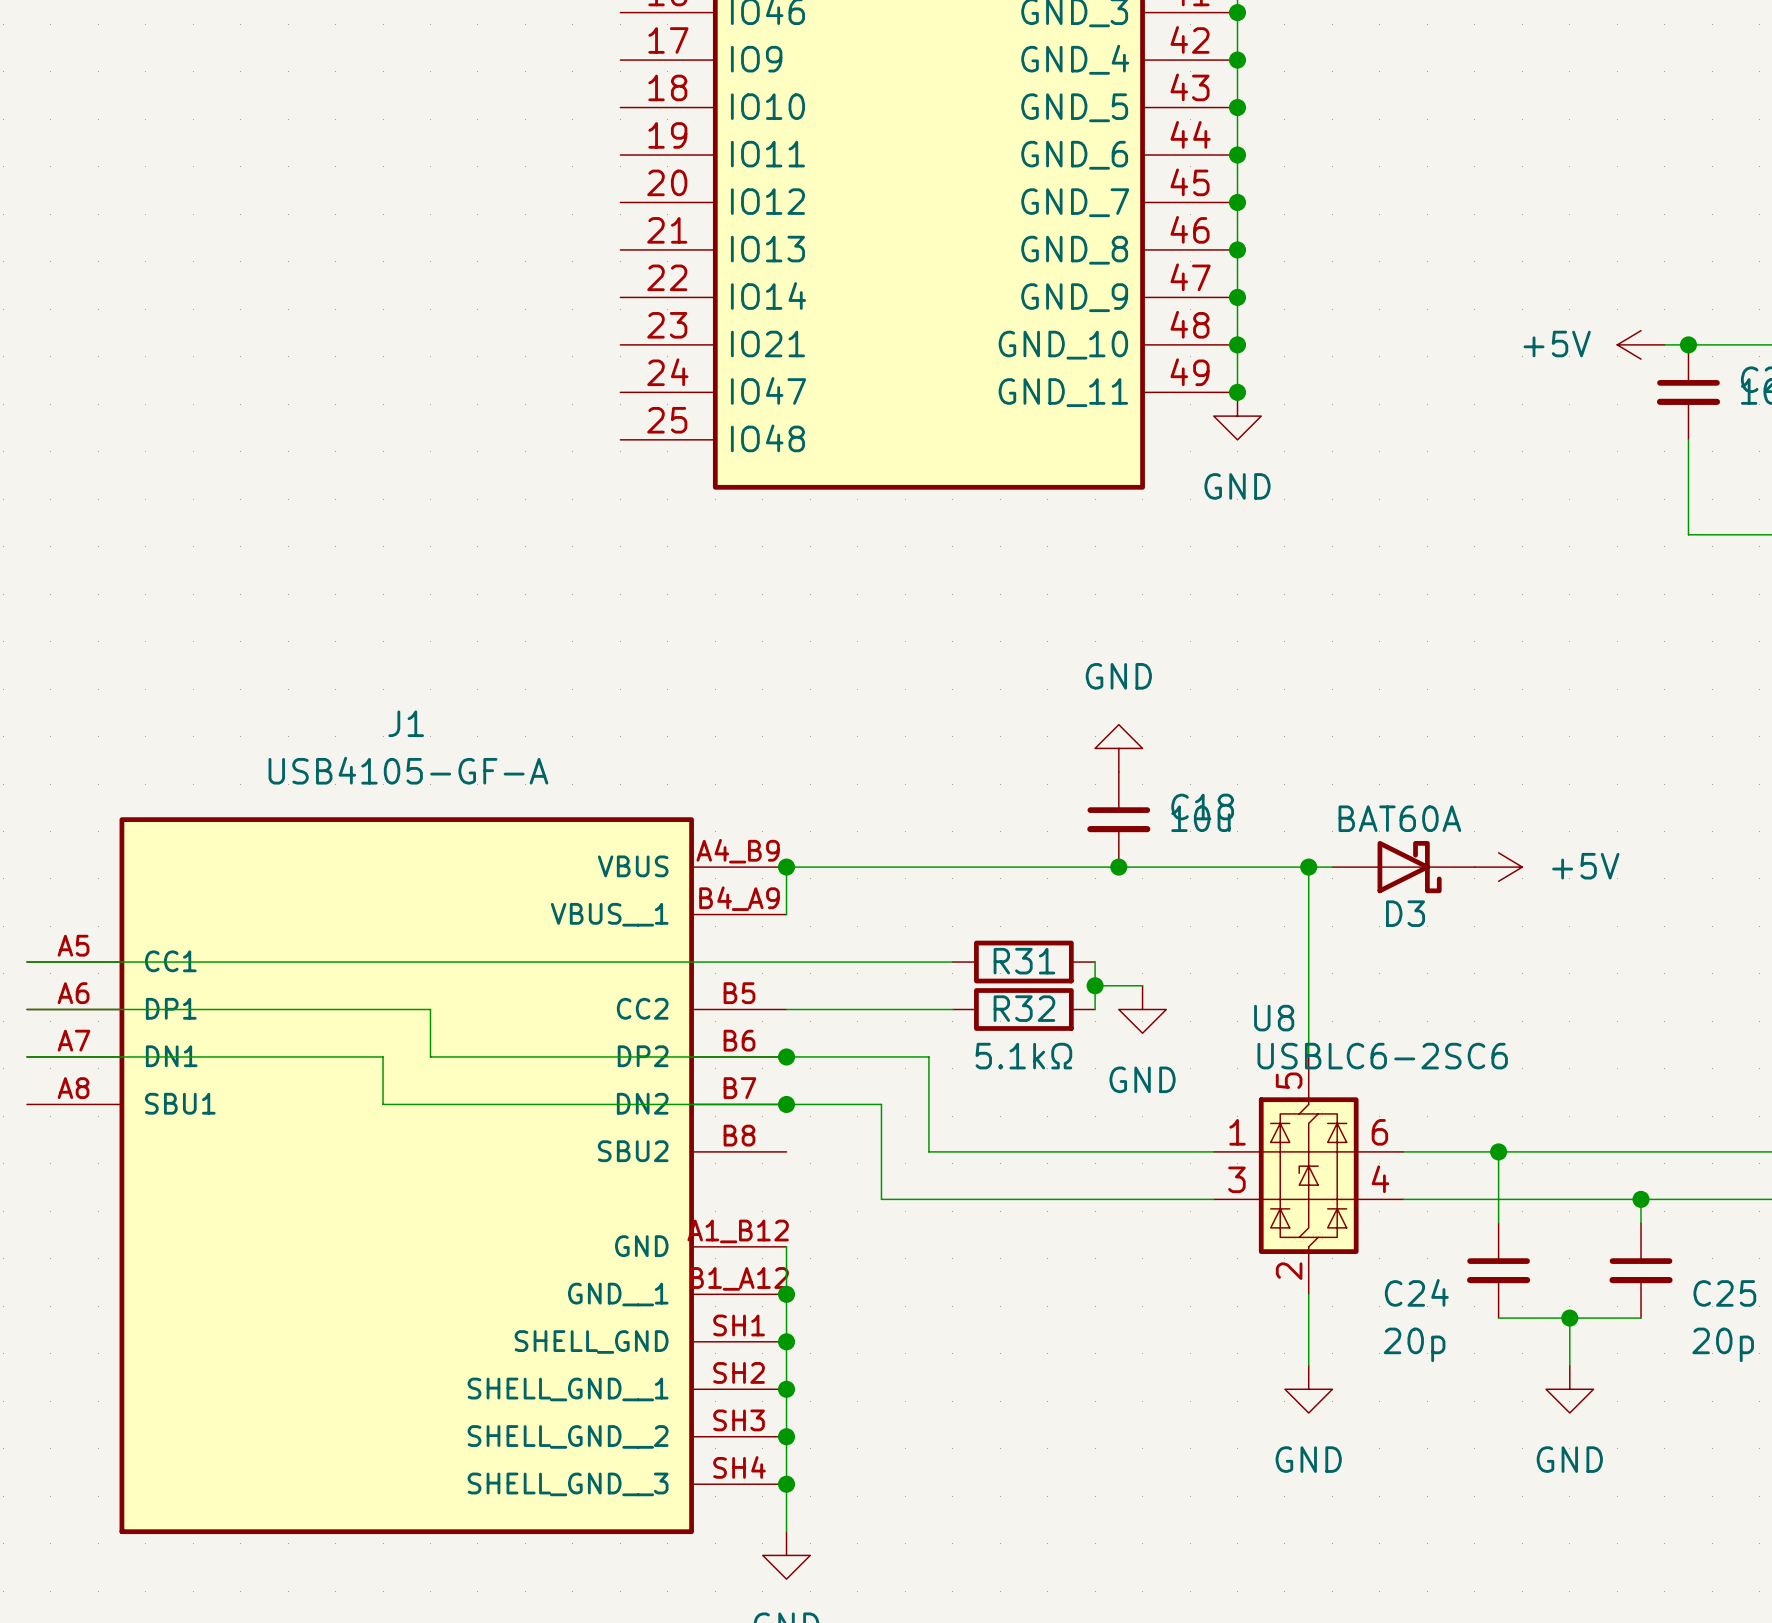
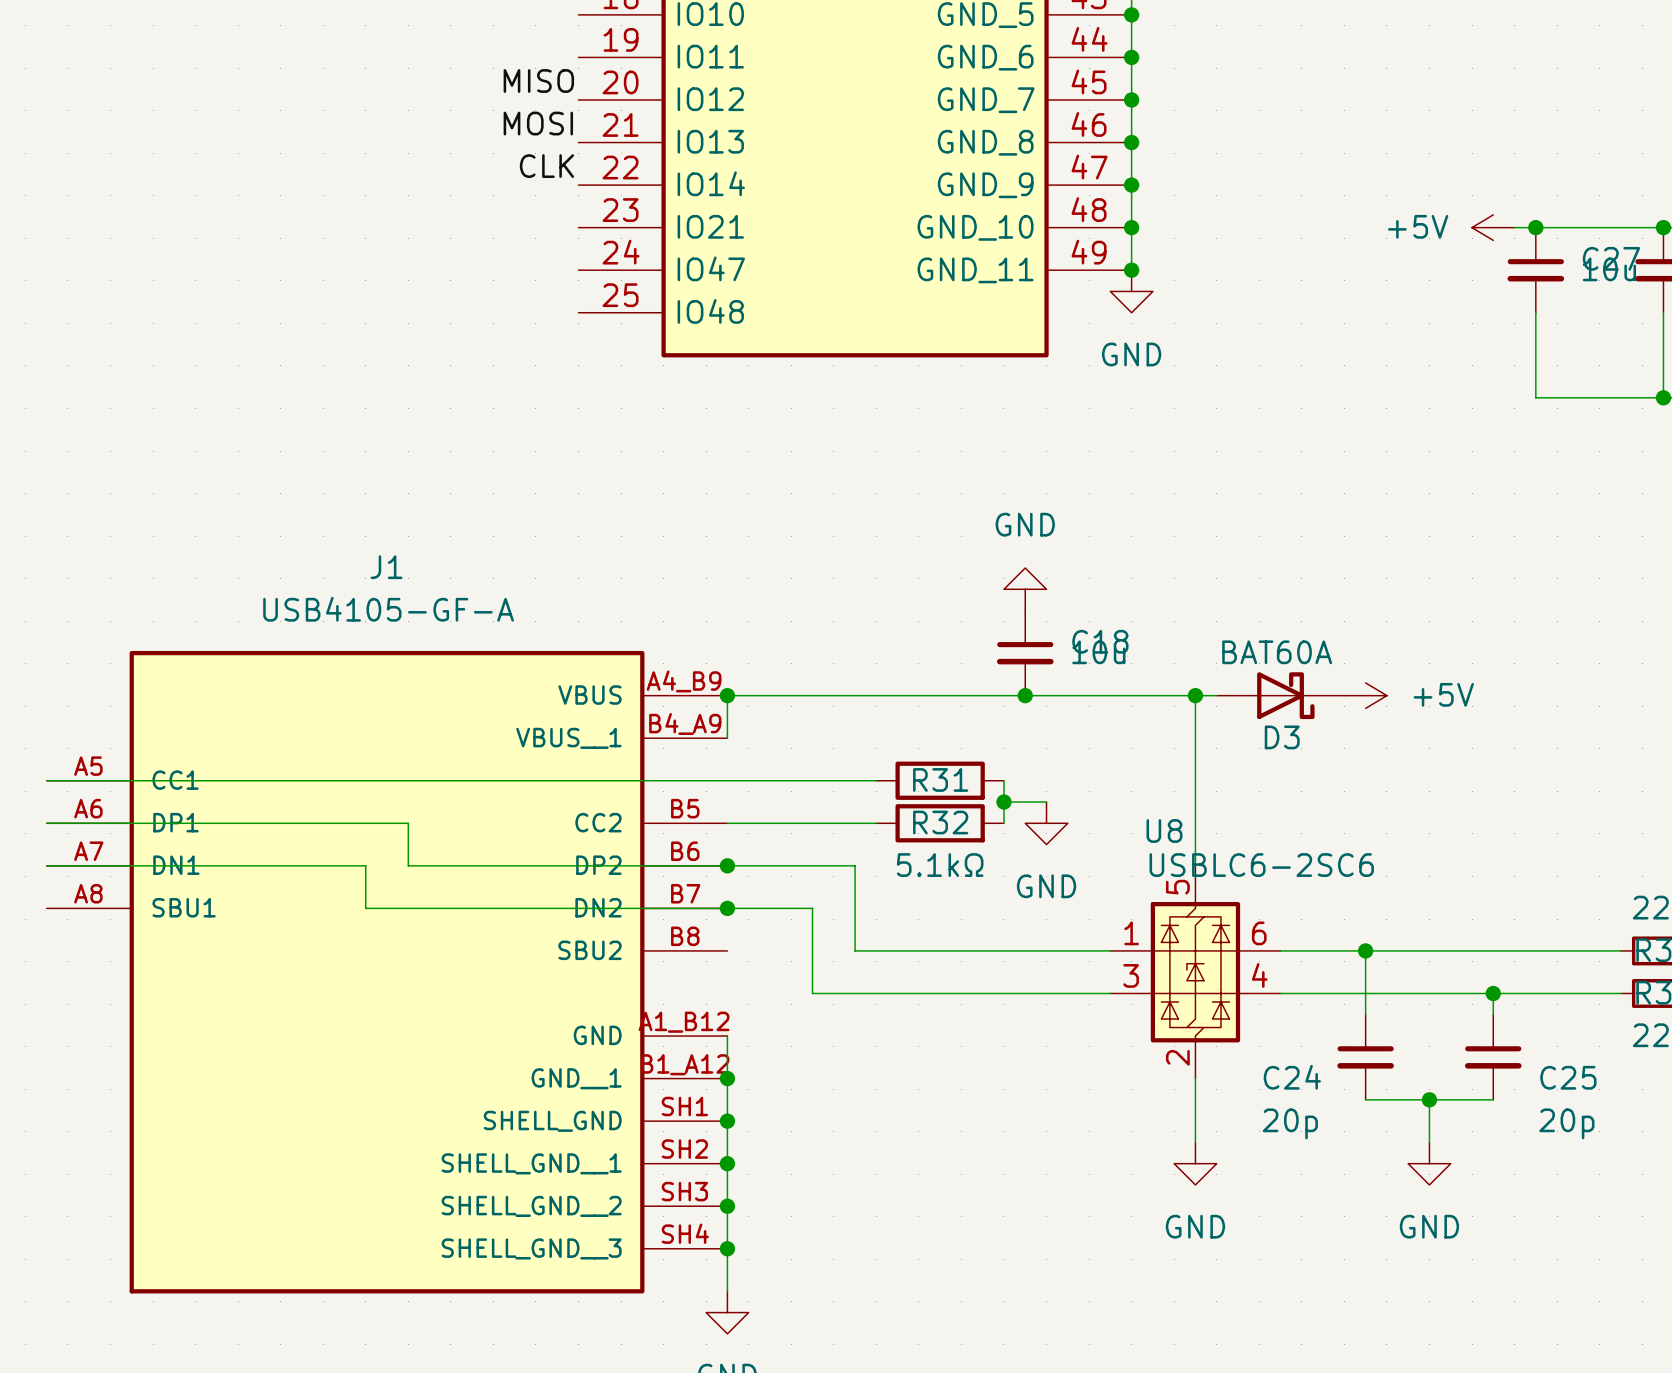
label: none -> MISO (538, 81)
label: none -> MOSI (538, 123)
label: none -> CLK (546, 166)

